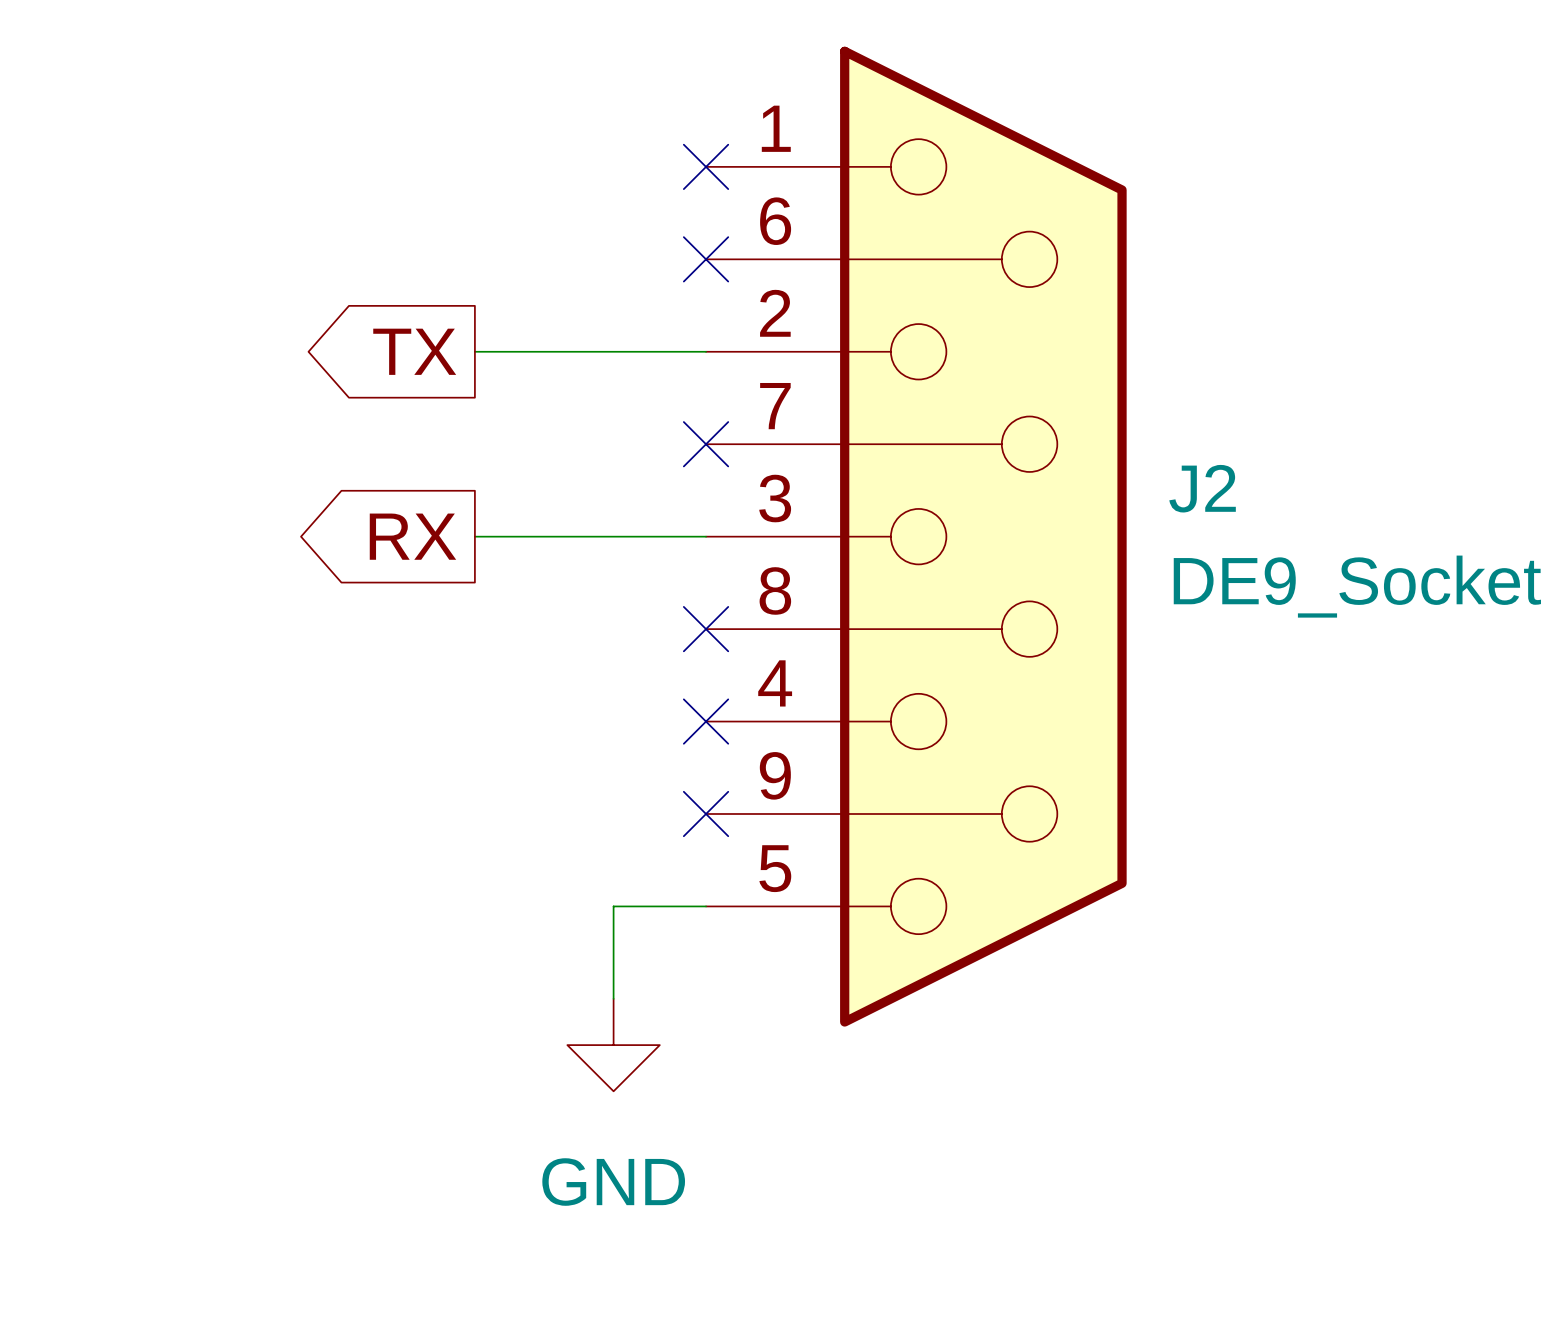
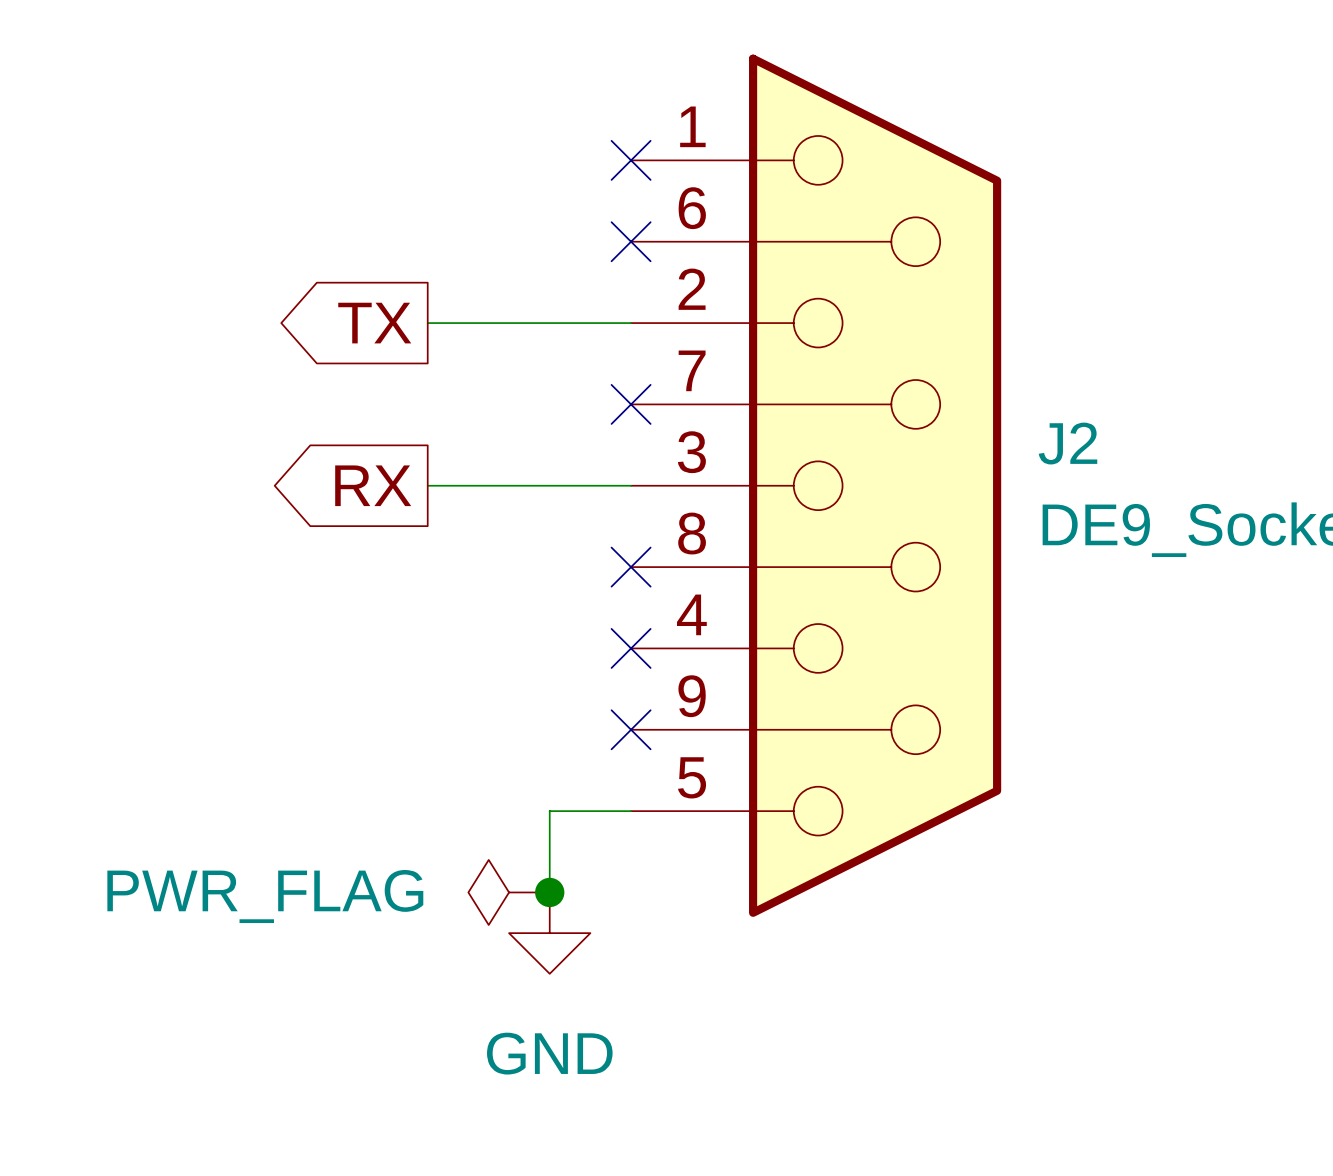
power symbol: none -> PWR_FLAG (509, 892)
junction: none -> (549, 892)

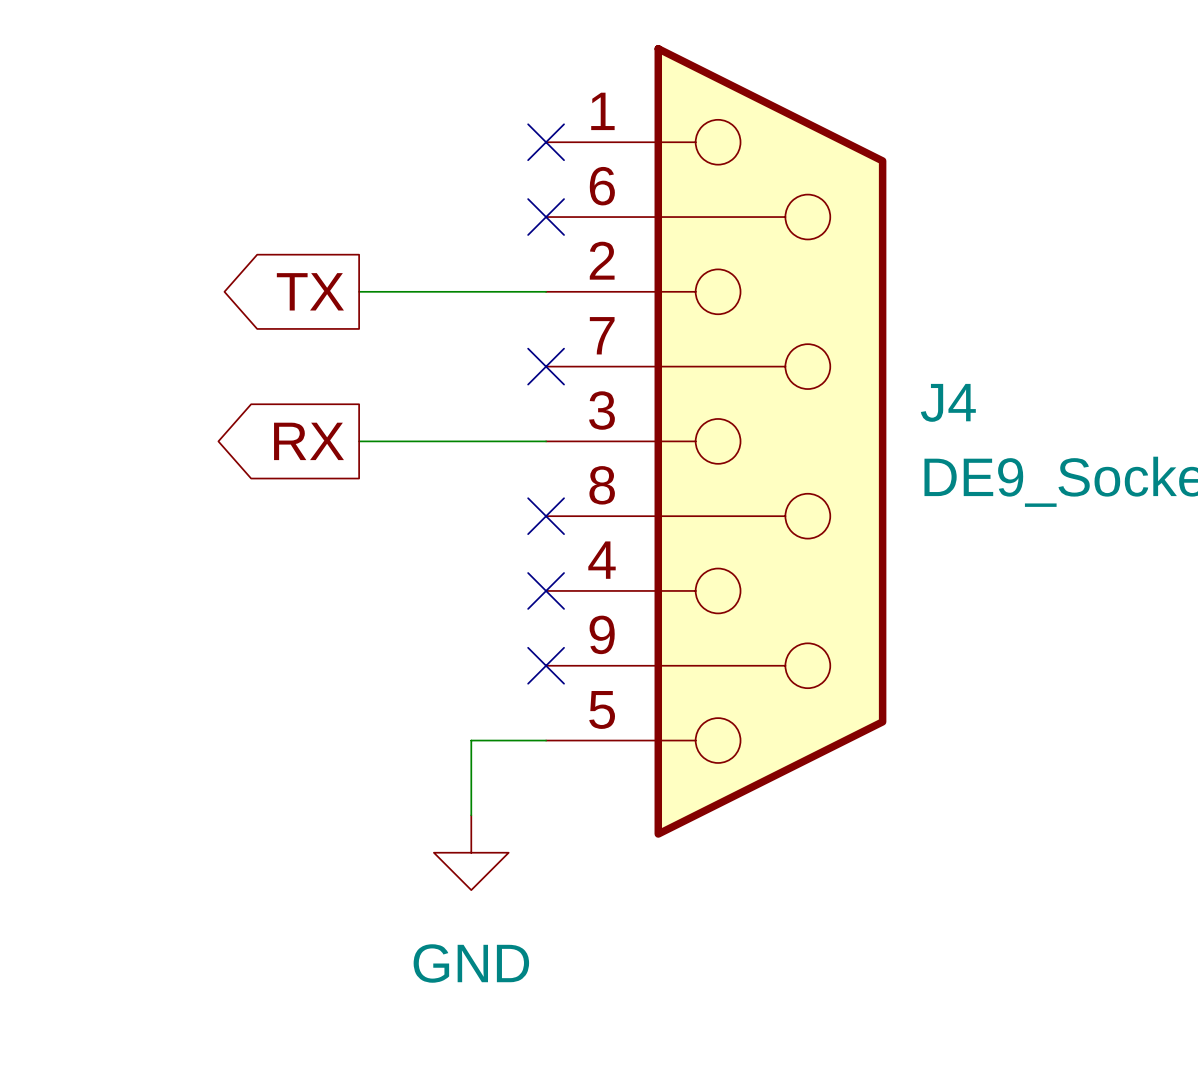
J2 name: J2 (1067, 443) -> J4 (948, 402)
power symbol: PWR_FLAG (509, 892) -> none
junction: (549, 892) -> none

